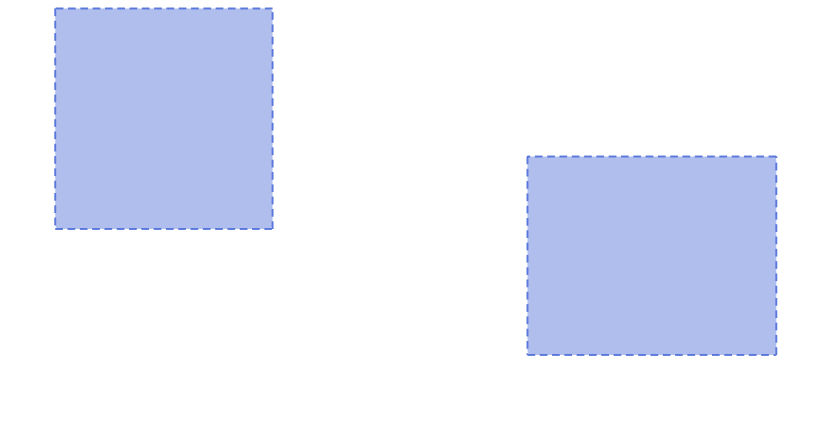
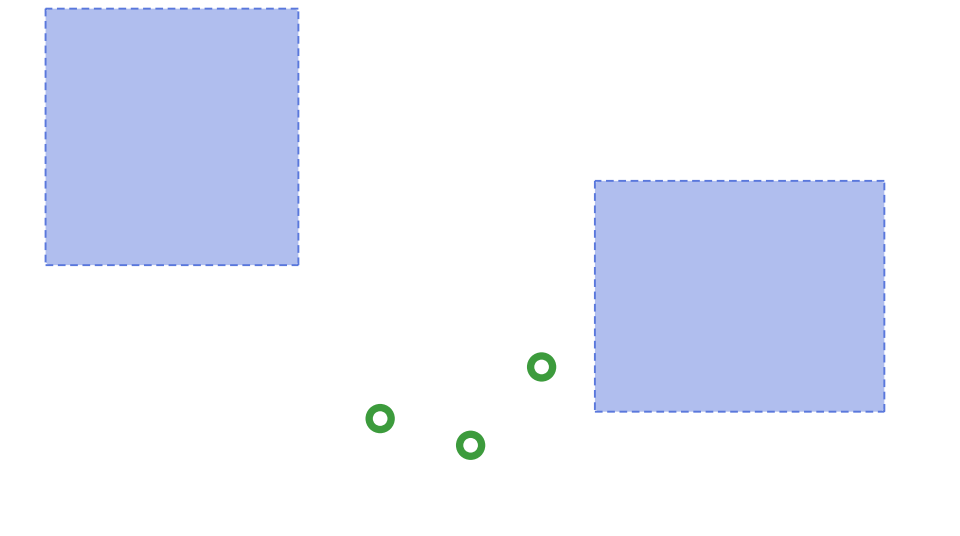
via: none -> (541, 366)
via: none -> (380, 418)
via: none -> (470, 445)

